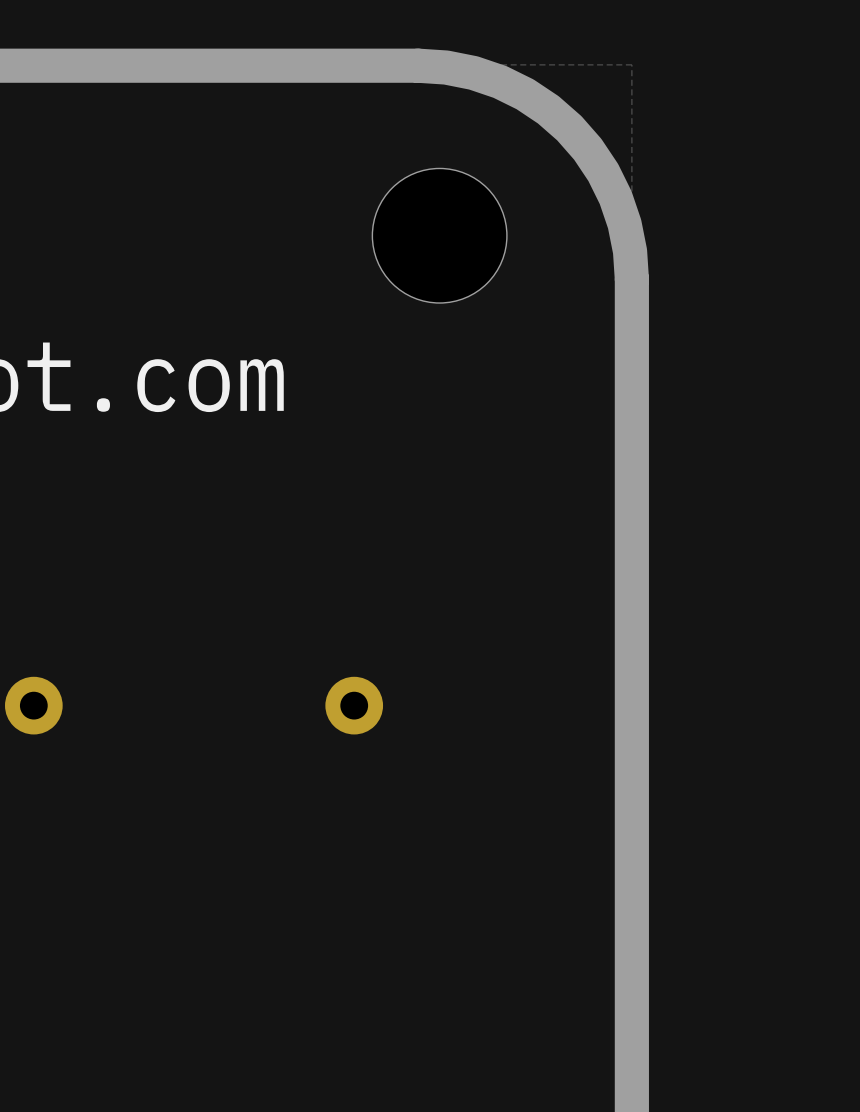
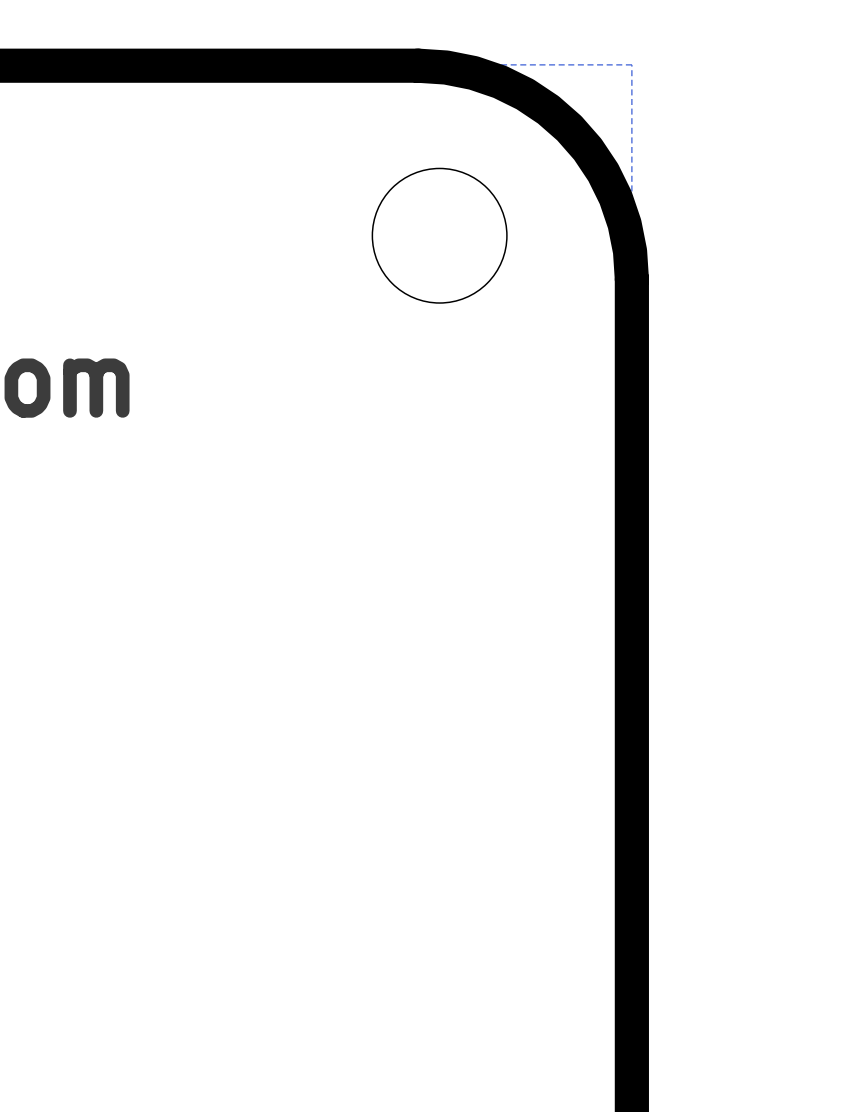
via: (33, 705) -> none
via: (354, 705) -> none

